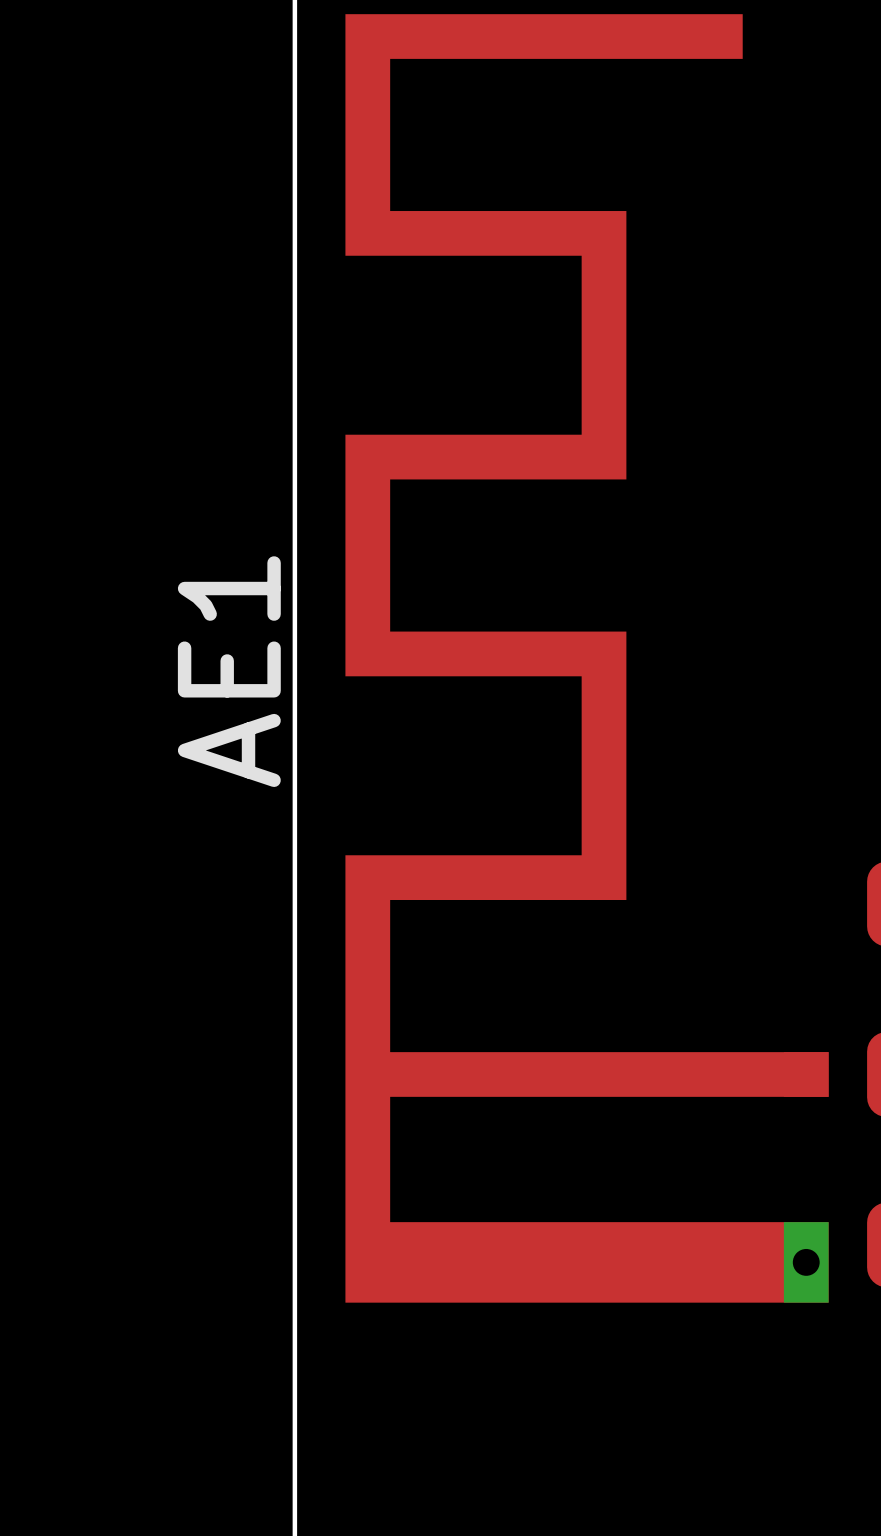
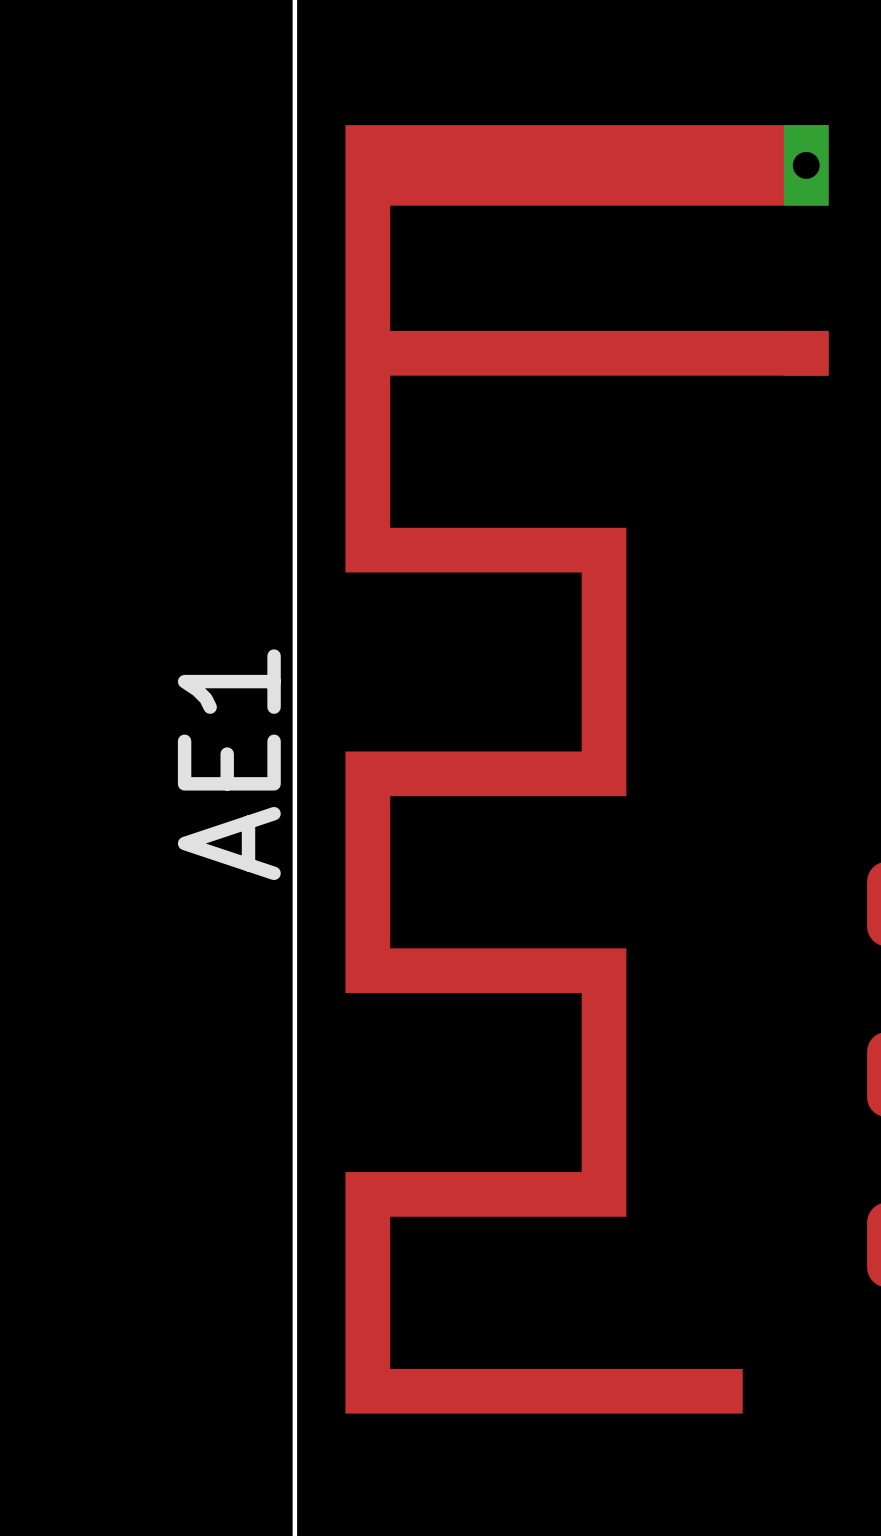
AE1 footprint: [345, 14, 829, 1303] -> [345, 125, 829, 1414]

